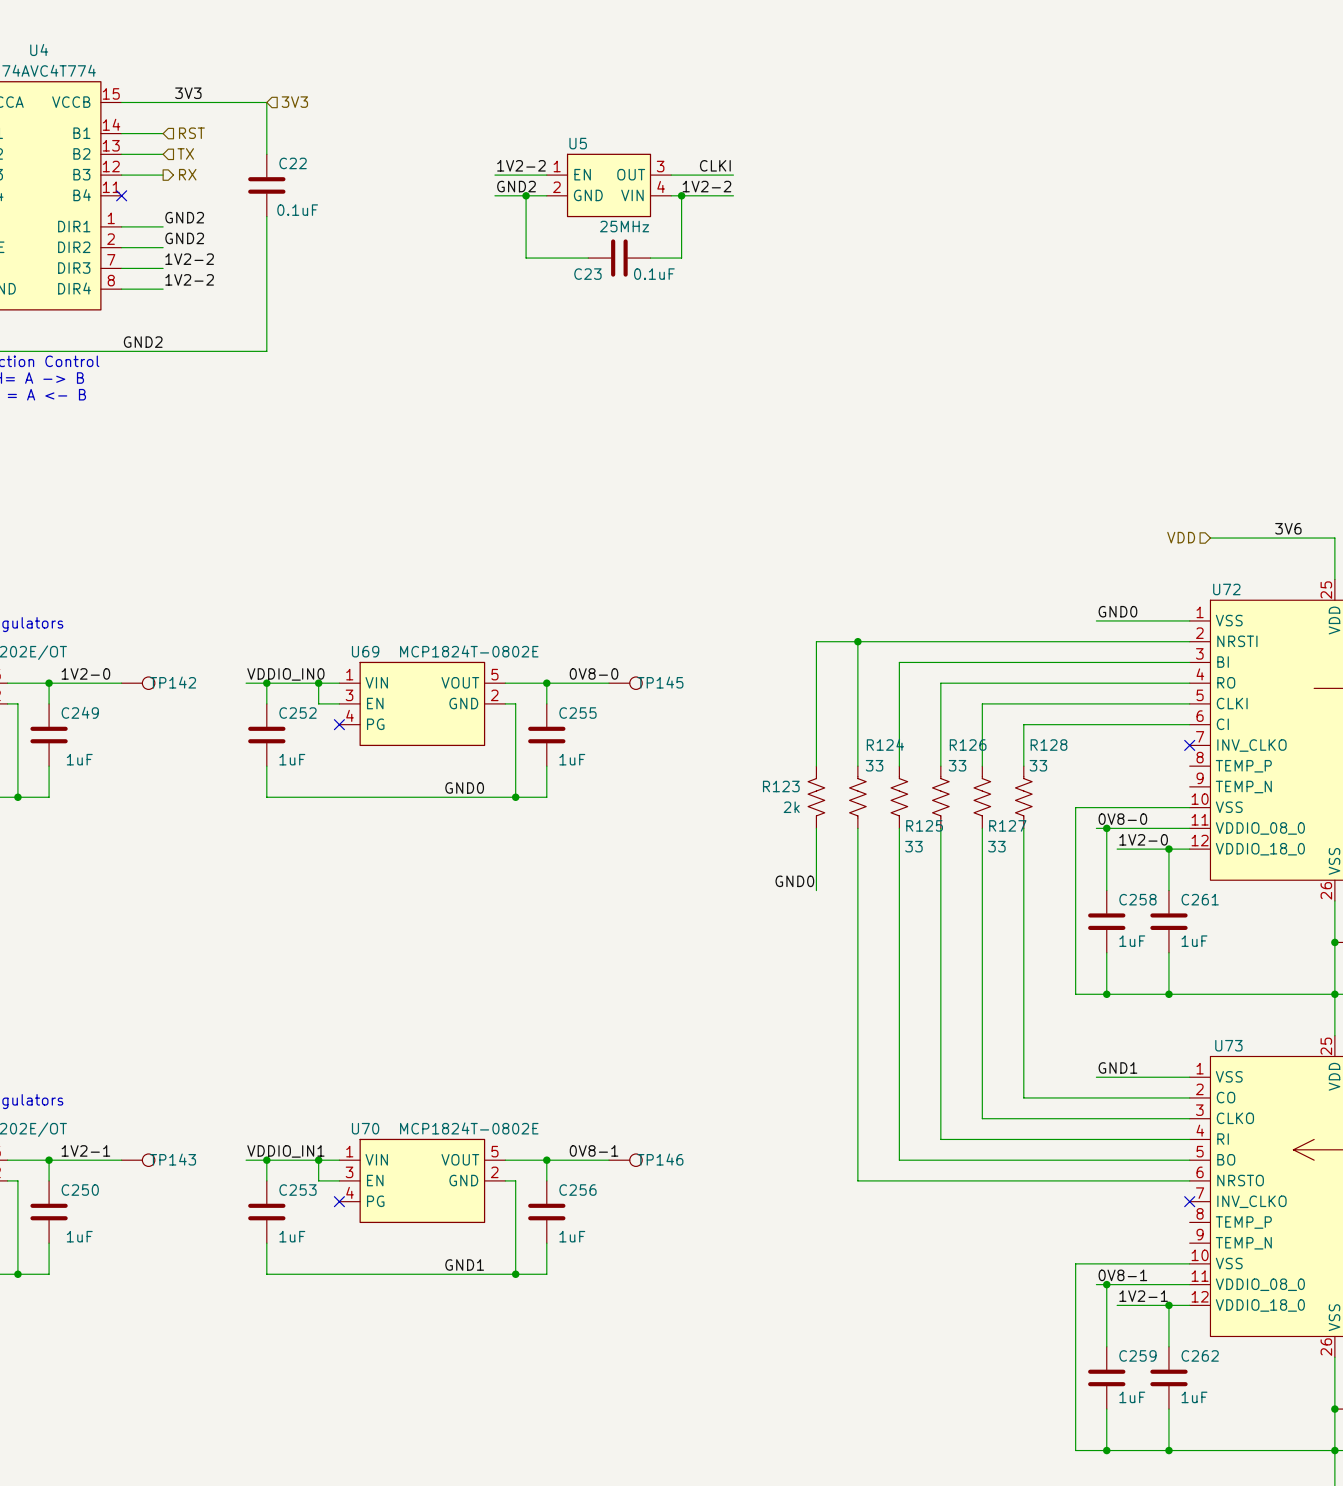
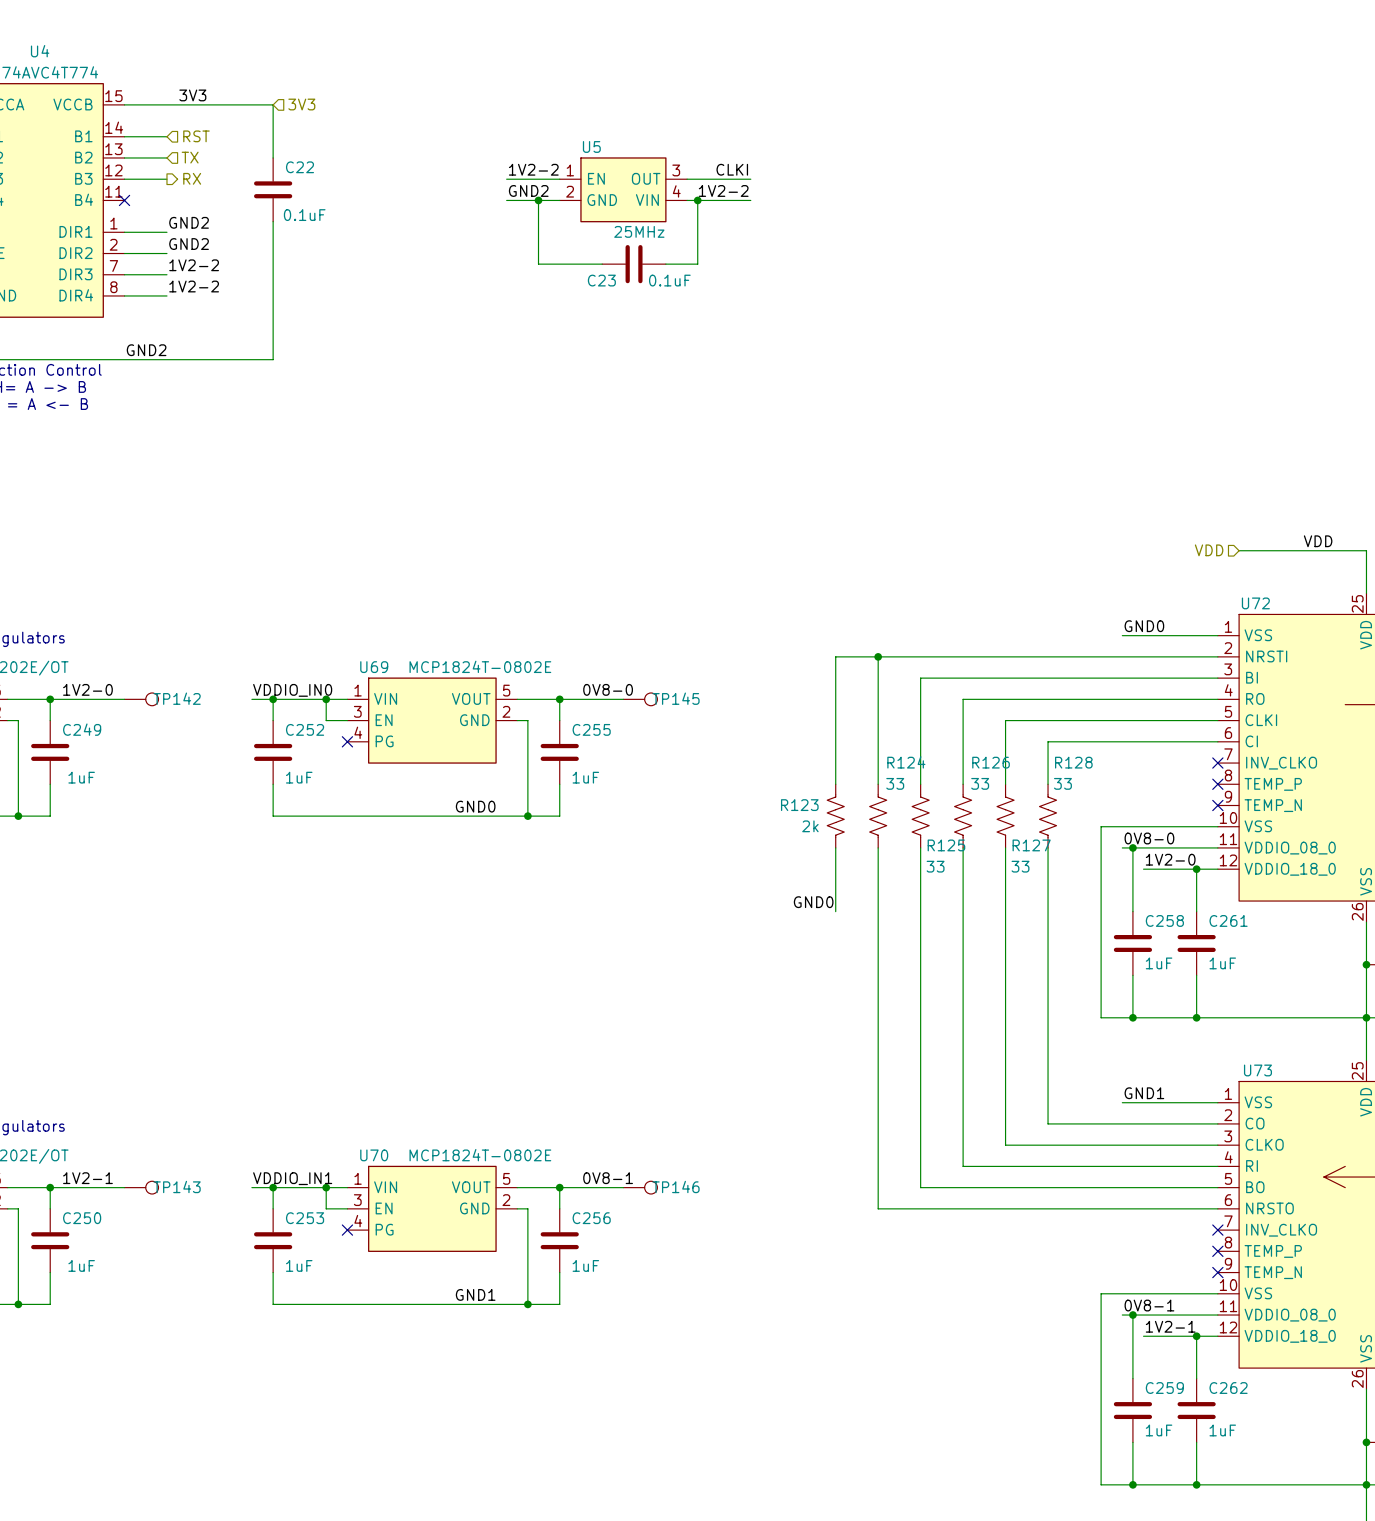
label: 3V6 (1288, 528) -> VDD (1318, 541)
no-connect mark: none -> (1217, 784)
no-connect mark: none -> (1217, 805)
no-connect mark: none -> (1217, 1251)
no-connect mark: none -> (1217, 1272)

